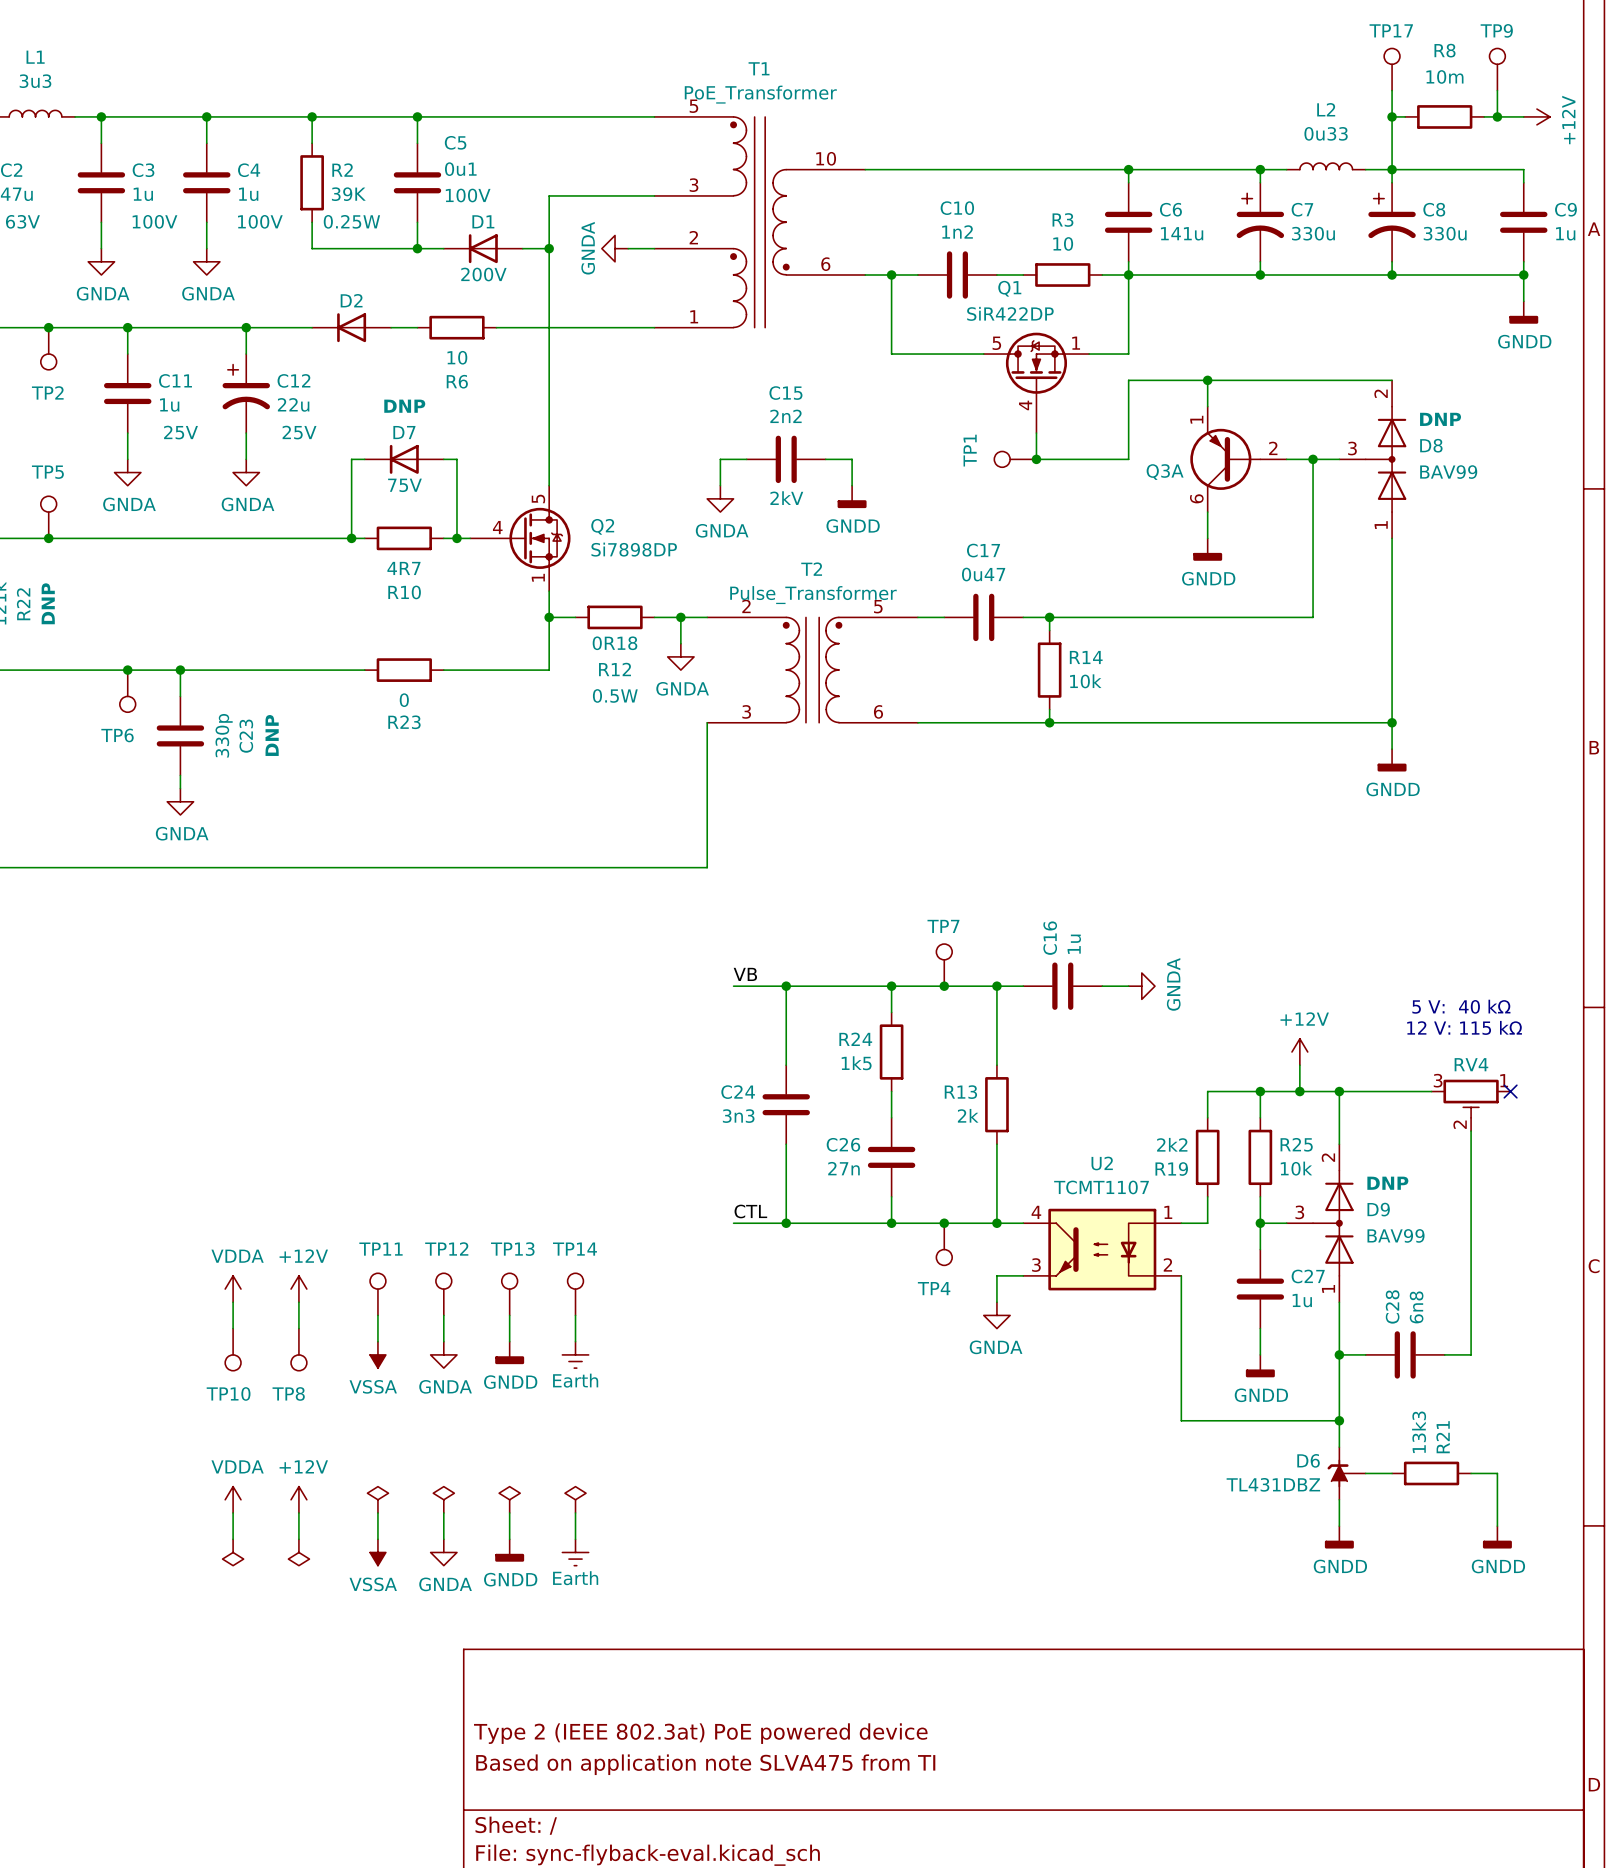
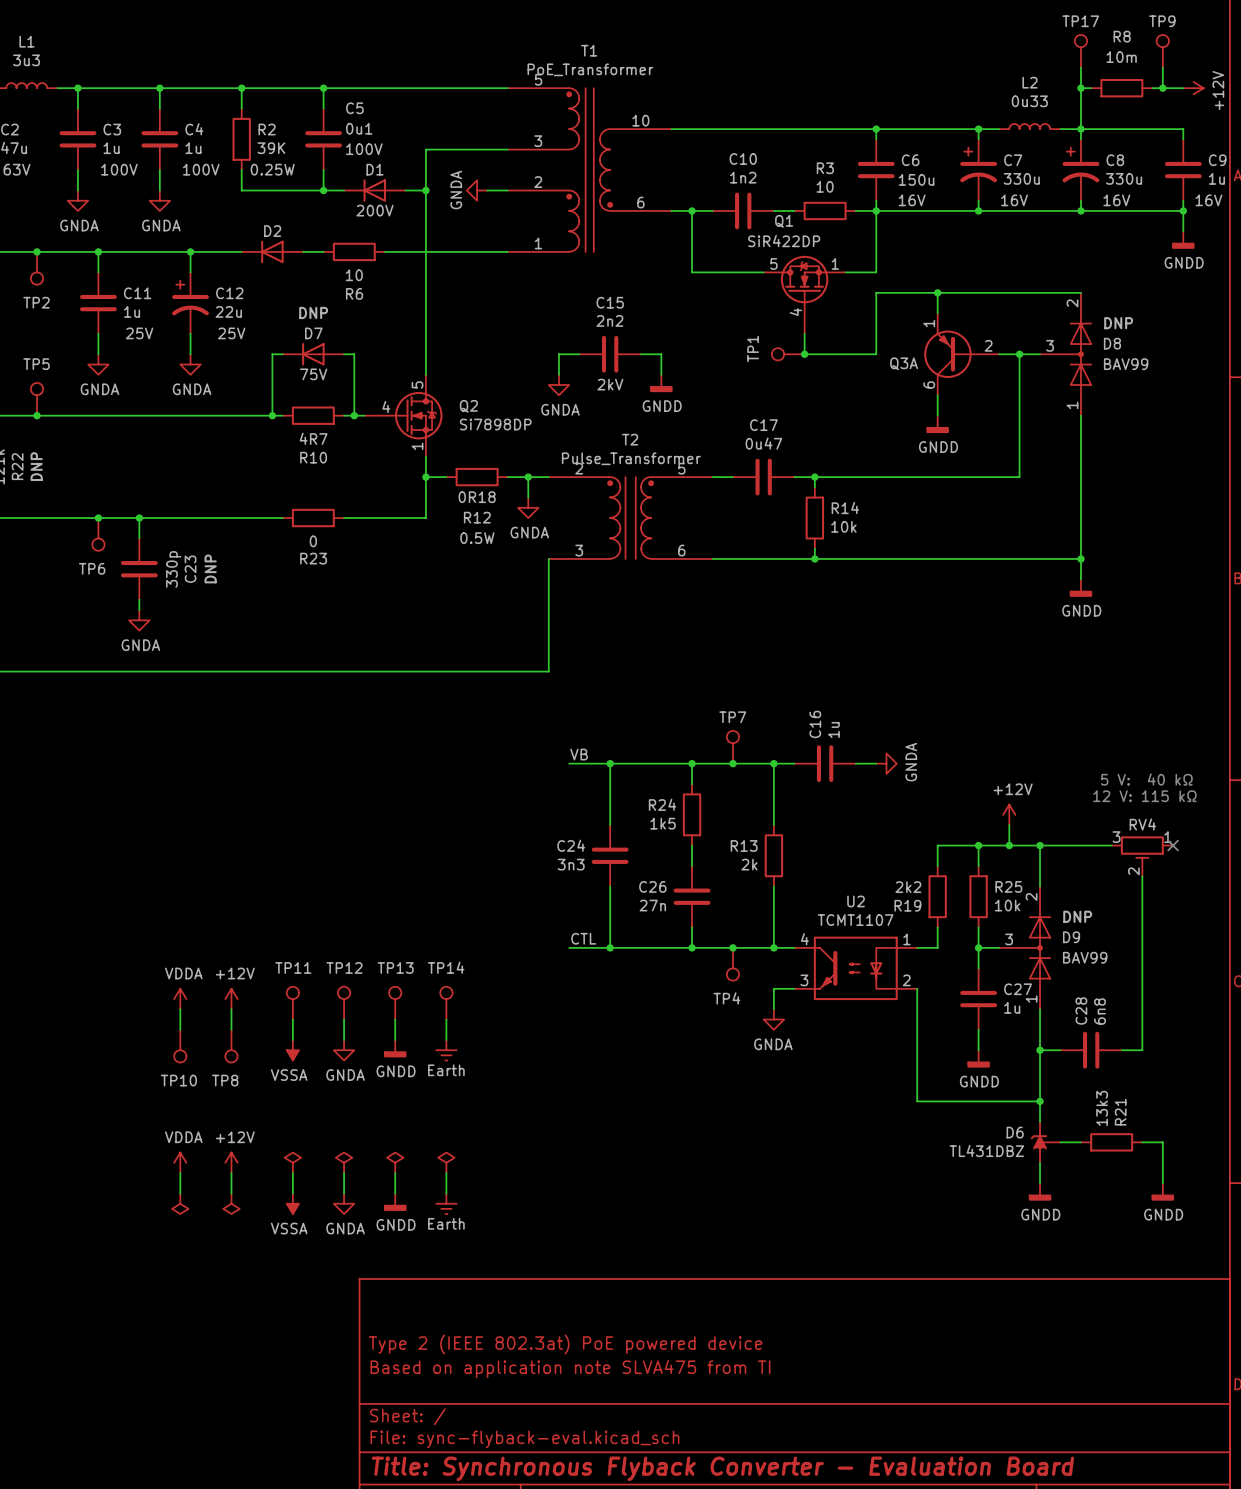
C6 value: 141u (1182, 233) -> 150u (916, 179)
C6 text: none -> 16V (912, 200)
C7 text: none -> 16V (1014, 200)
C8 text: none -> 16V (1116, 200)
C9 text: none -> 16V (1208, 200)

